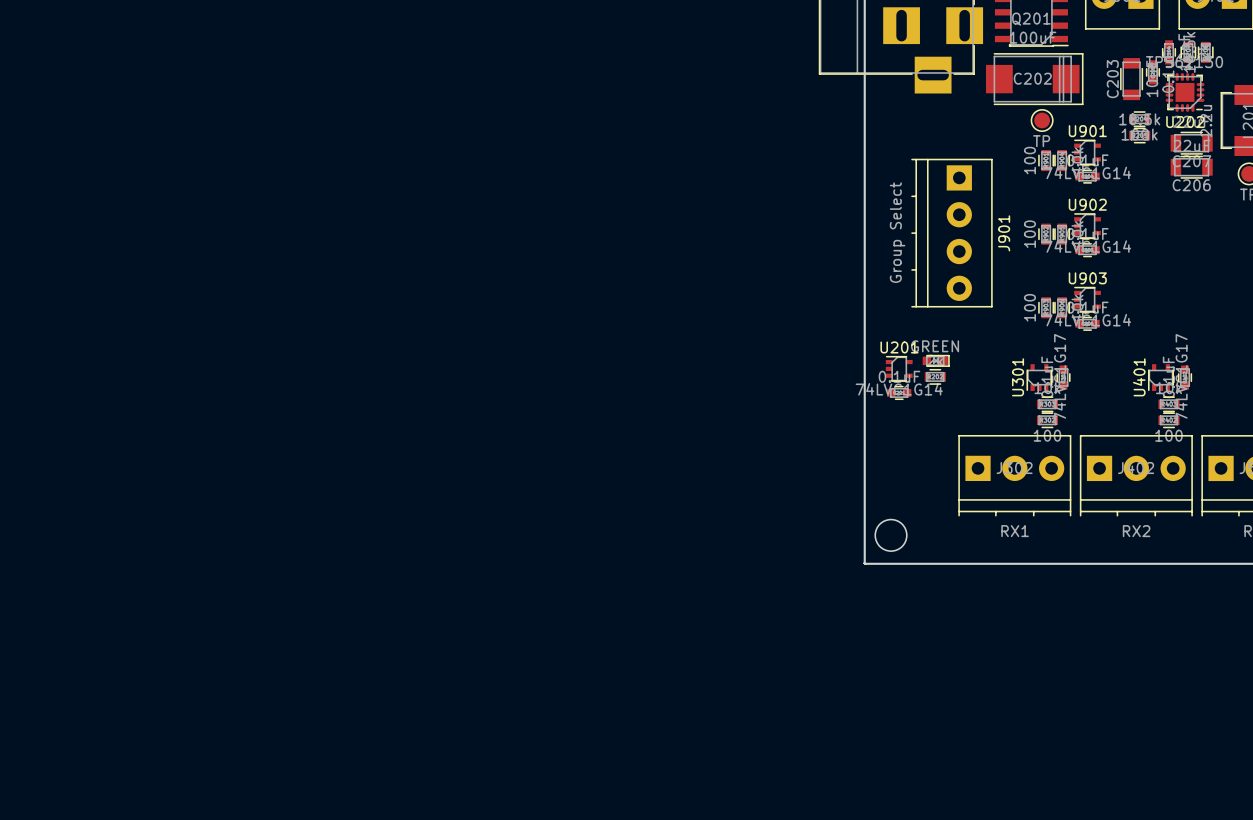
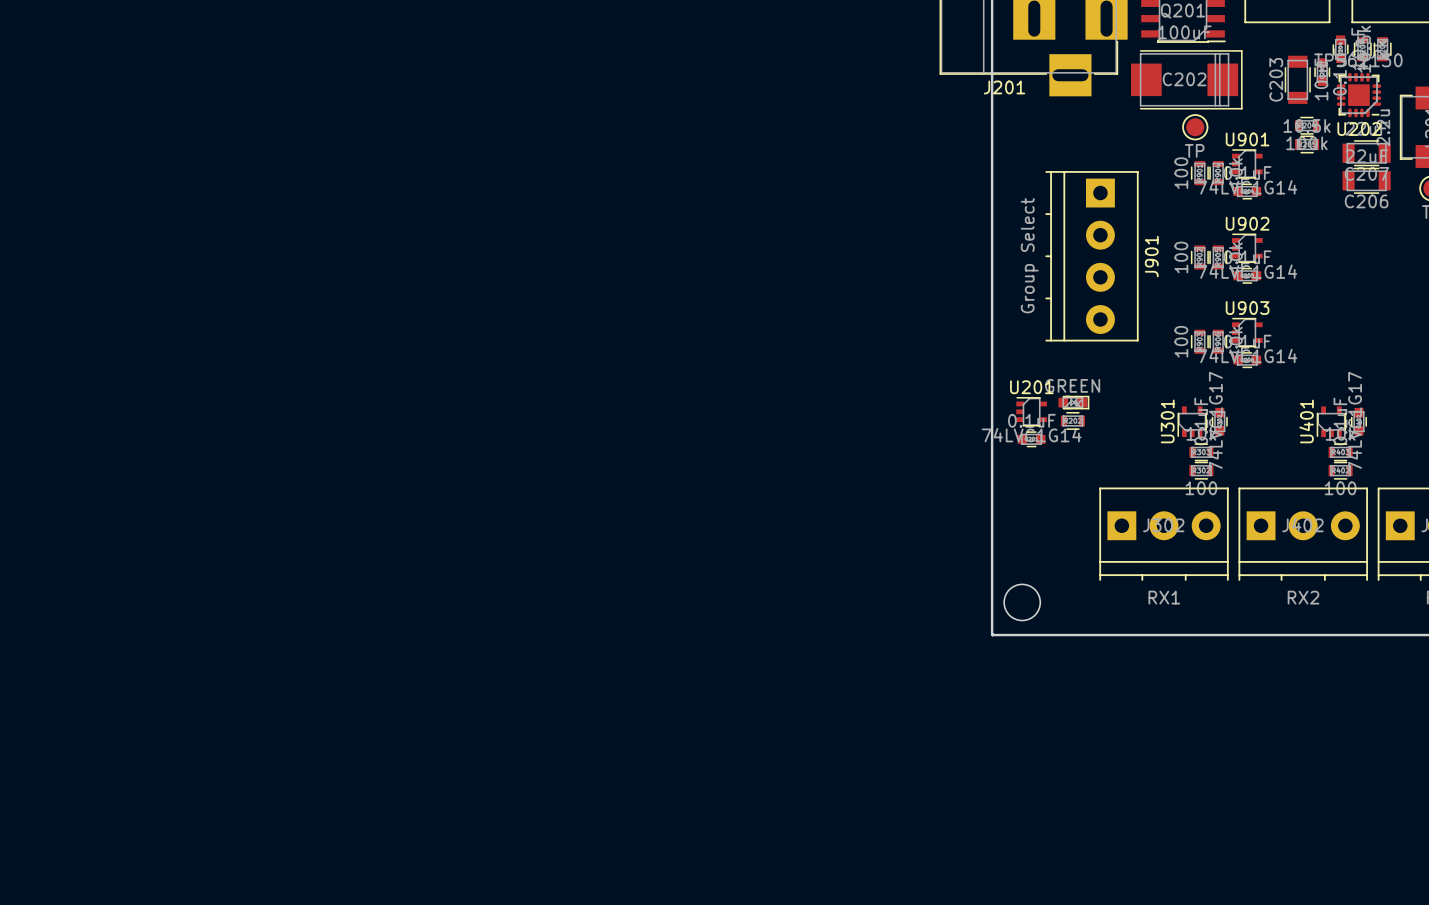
J201 name: none -> J201 (1004, 87)

